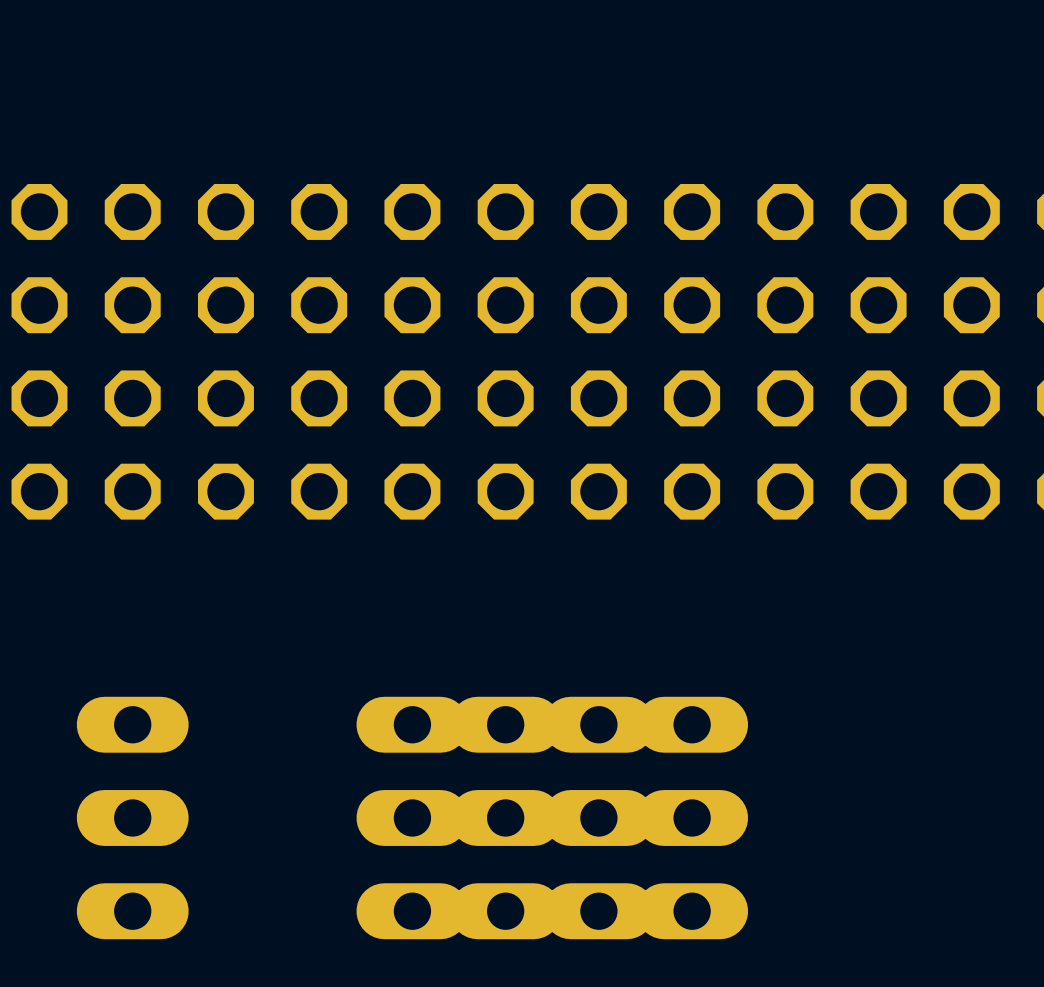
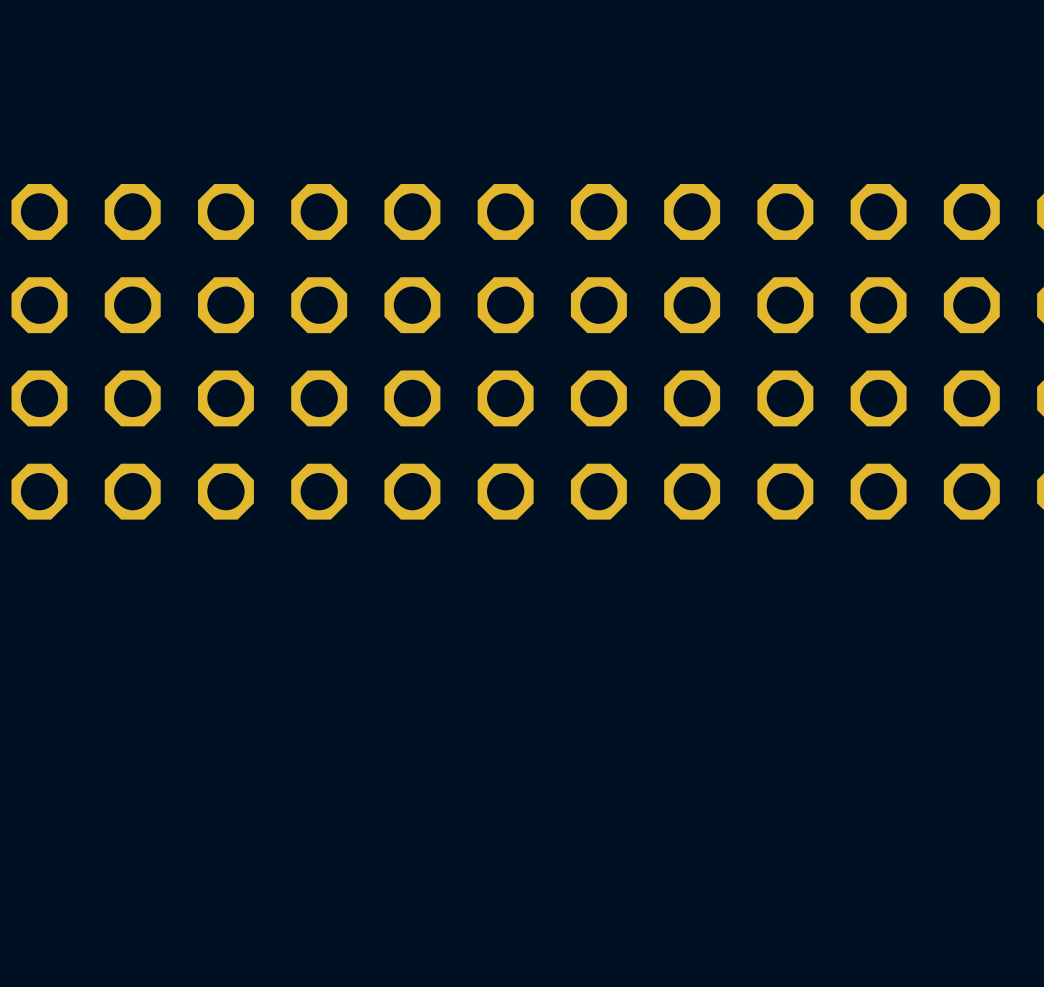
part: (132, 817) -> none
part: (412, 817) -> none
part: (505, 817) -> none
part: (598, 817) -> none
part: (692, 817) -> none

